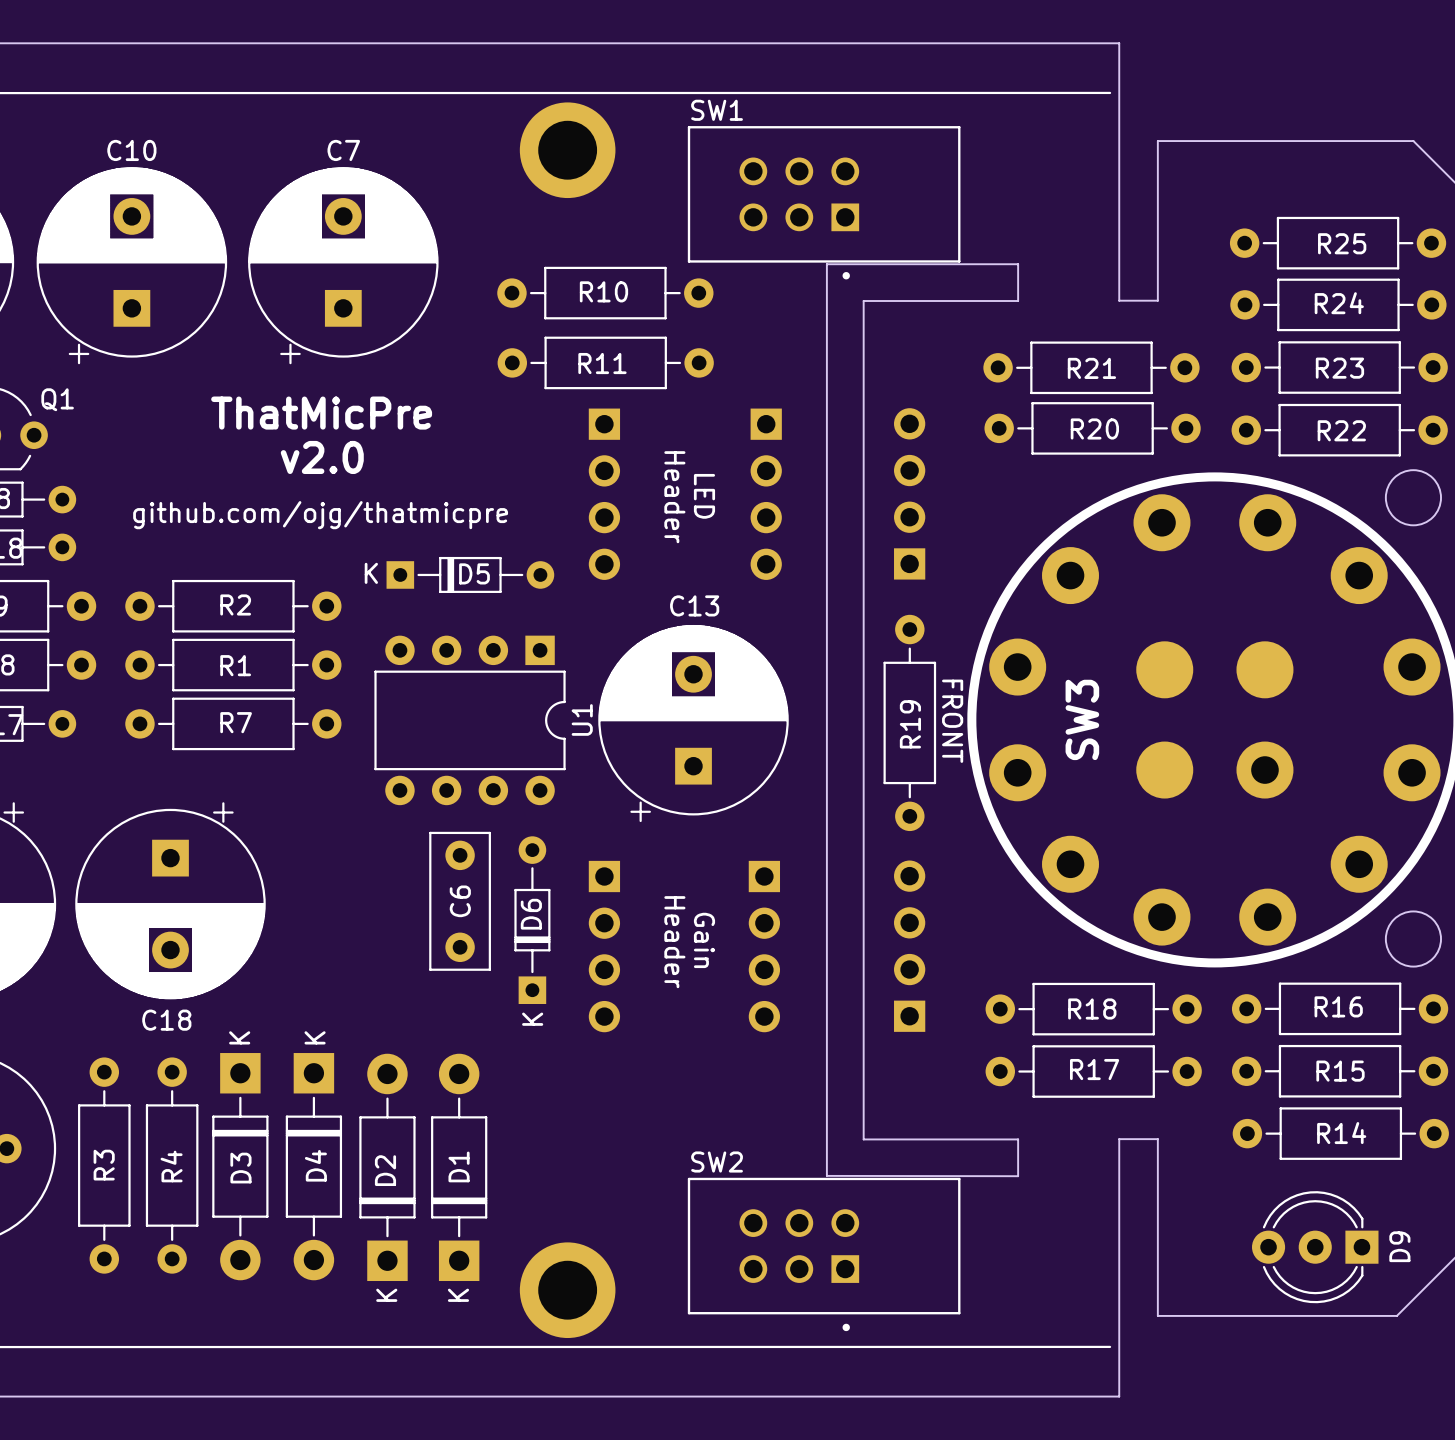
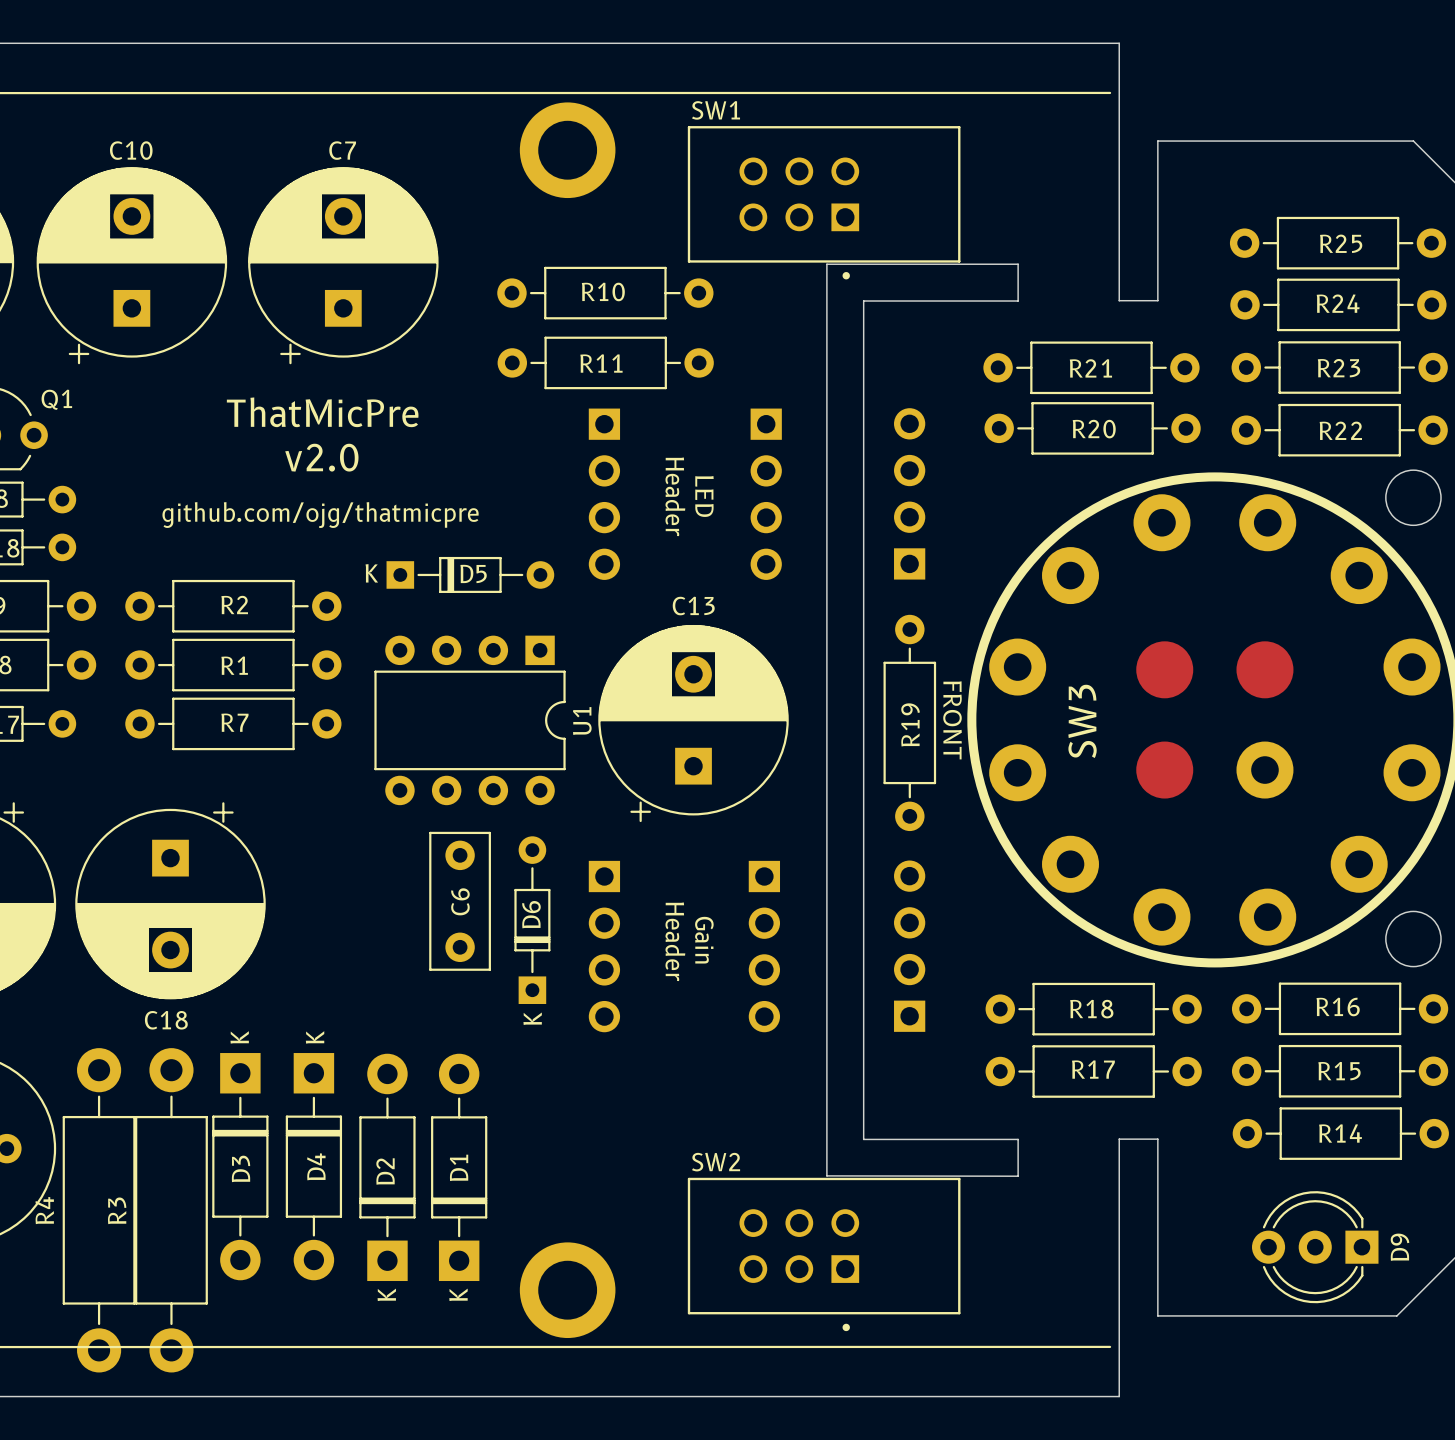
R3 footprint: [78, 1057, 131, 1274] -> [135, 1048, 208, 1373]
R4 footprint: [145, 1057, 199, 1274] -> [62, 1048, 136, 1373]
R3 name position: R3 (104, 1165) -> R3 (117, 1210)
R4 name position: R4 (171, 1166) -> R4 (44, 1210)

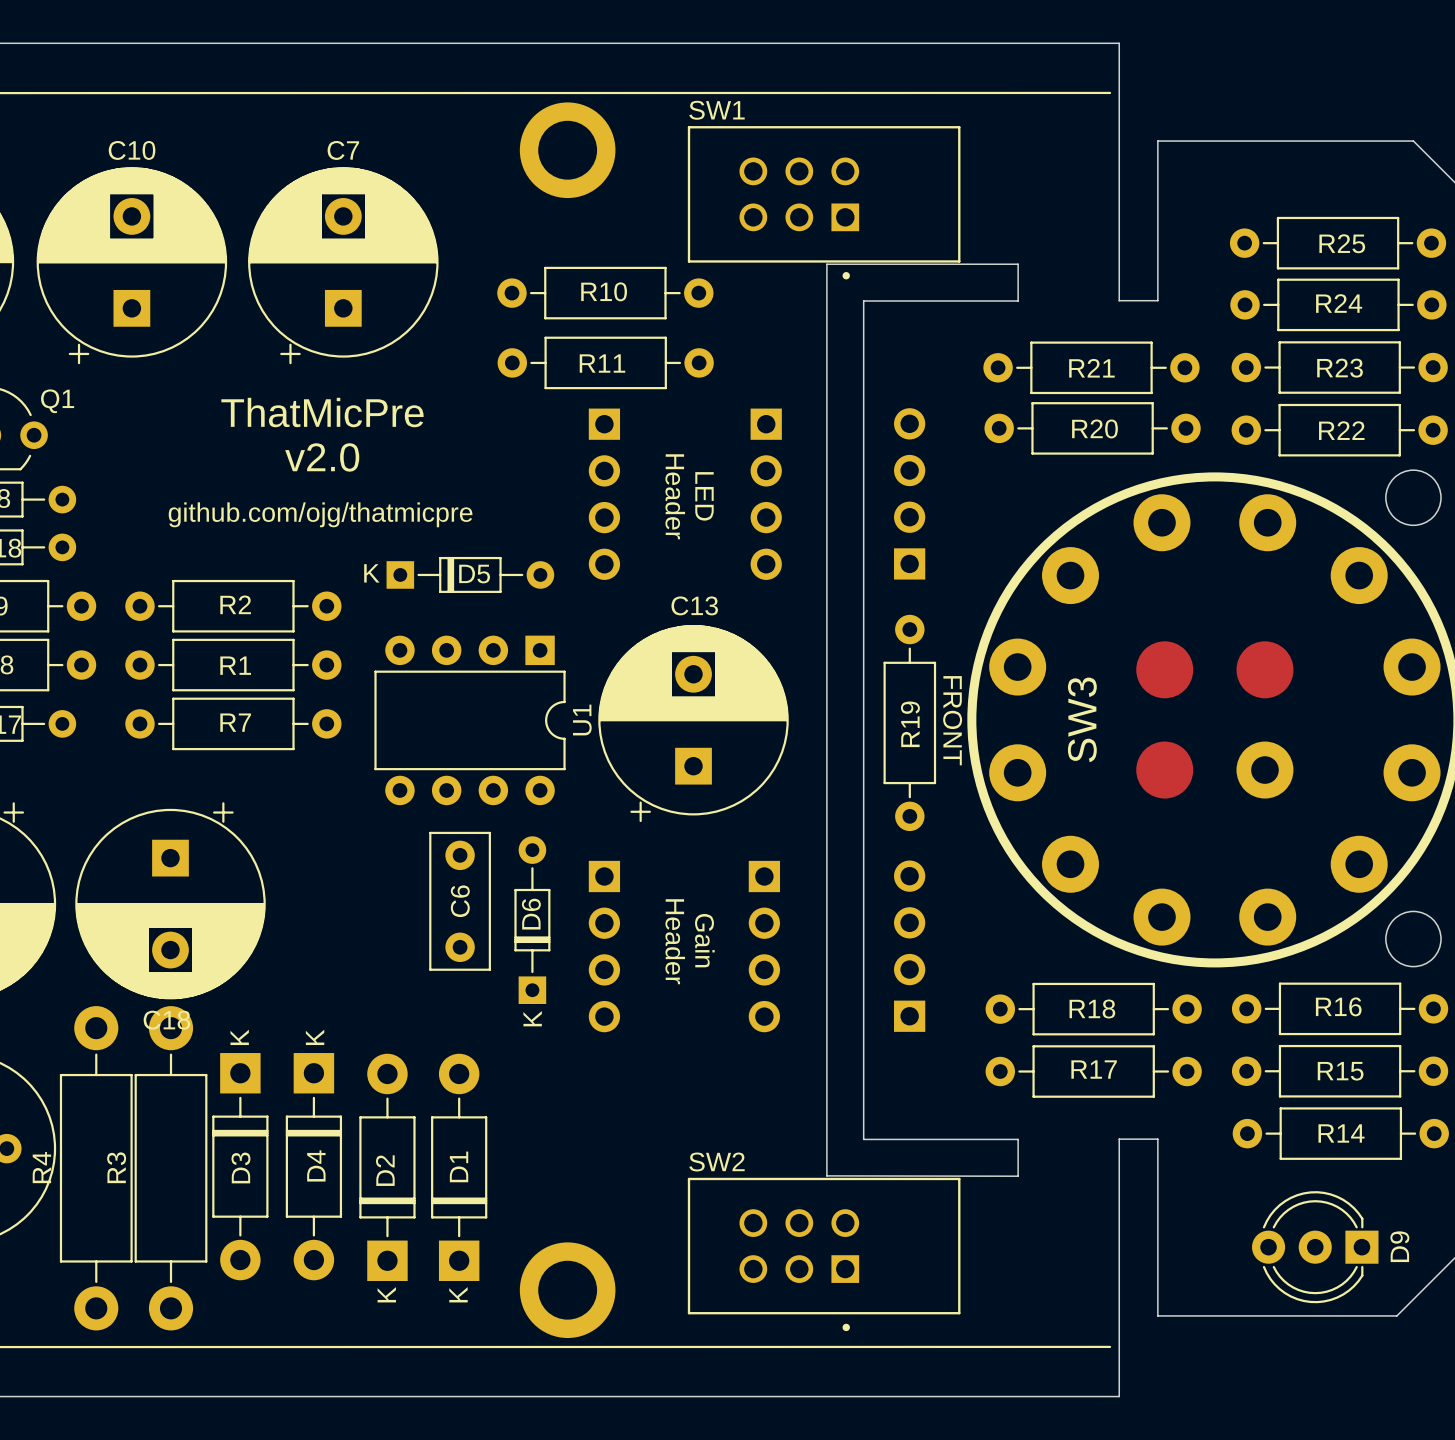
R4 position: (99, 1210) -> (96, 1168)
R3 position: (171, 1210) -> (171, 1168)

